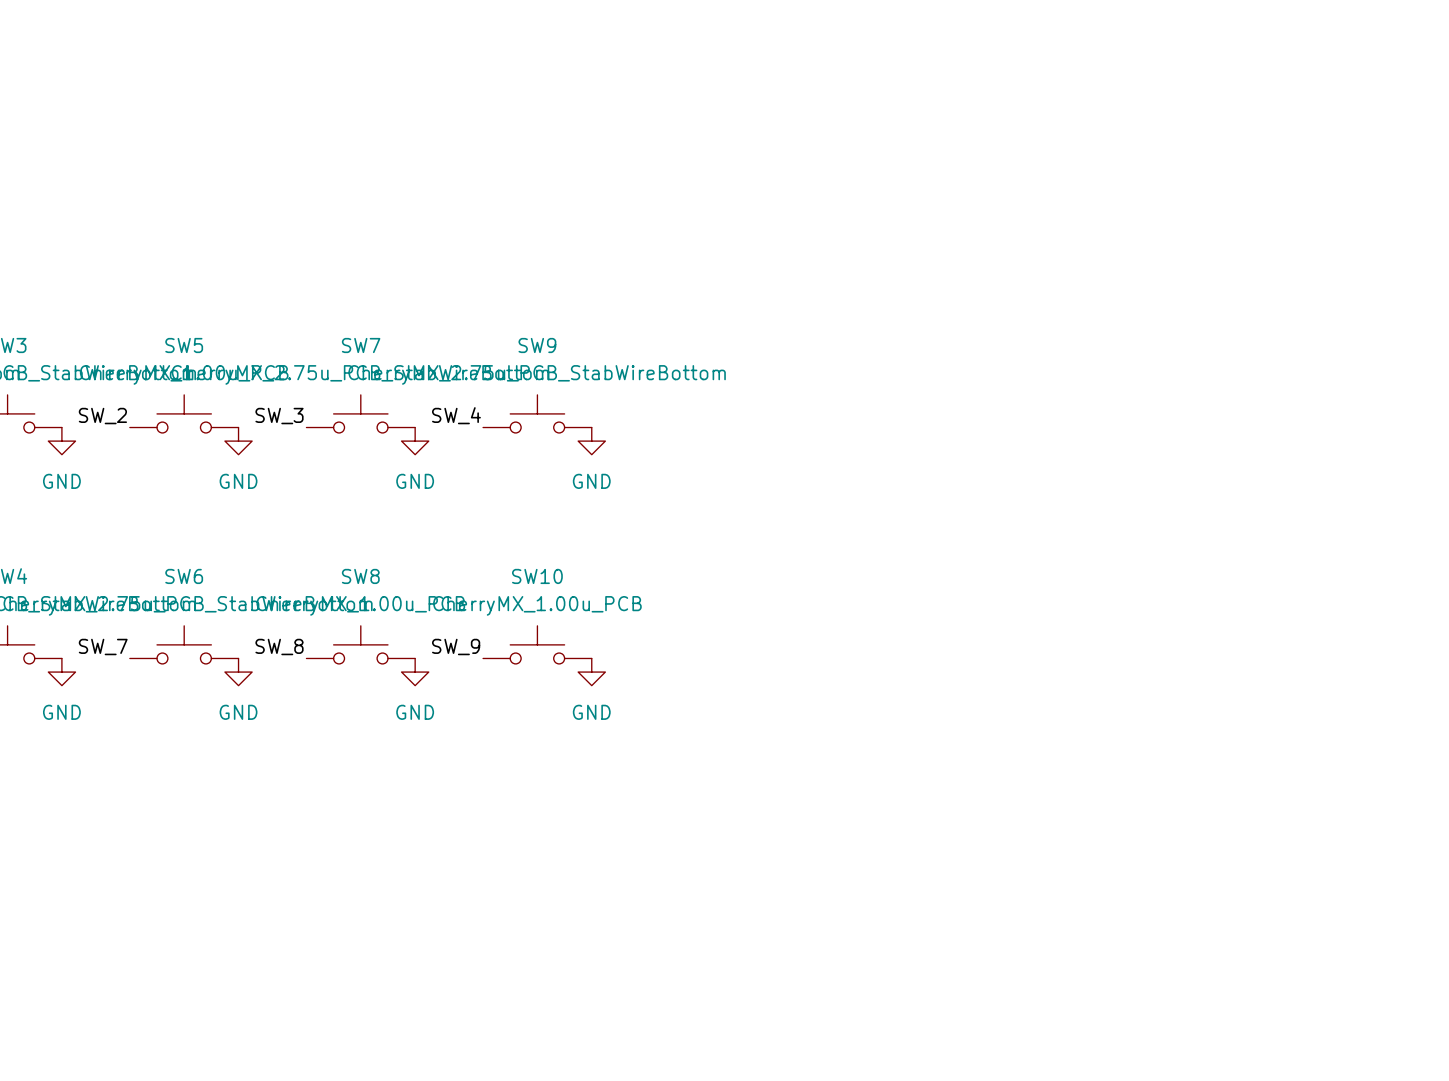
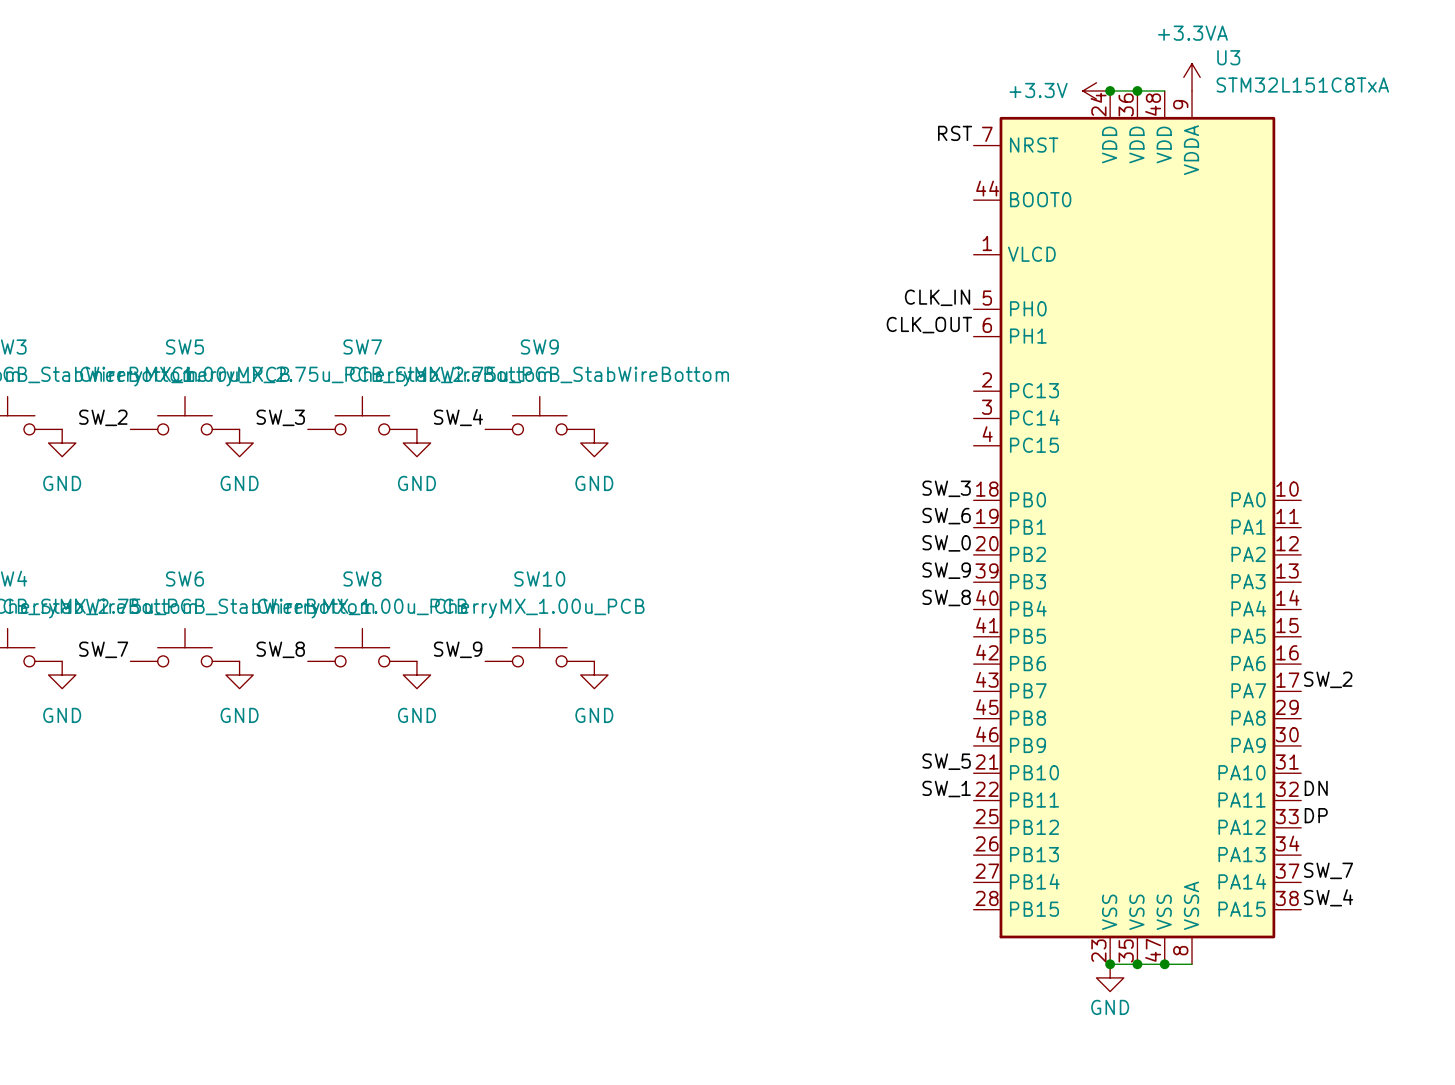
power symbol: none -> +3.3VA (1192, 77)
power symbol: none -> +3.3V (1096, 90)
wire: none -> (1110, 90) (1164, 90)
junction: none -> (1110, 90)
junction: none -> (1137, 90)
label: none -> RST (955, 133)
label: none -> CLK_IN (937, 297)
label: none -> CLK_OUT (929, 325)
label: none -> SW_3 (946, 488)
label: none -> SW_6 (946, 516)
U3: none -> STM32L151C8TxA (1137, 527)
label: none -> SW_0 (946, 543)
label: none -> SW_9 (946, 570)
label: none -> SW_8 (946, 597)
label: none -> SW_2 (1328, 679)
label: none -> SW_5 (946, 761)
label: none -> DN (1316, 788)
label: none -> SW_1 (946, 789)
label: none -> DP (1316, 815)
label: none -> SW_7 (1328, 870)
label: none -> SW_4 (1328, 897)
wire: none -> (1110, 964) (1192, 964)
junction: none -> (1110, 964)
junction: none -> (1137, 964)
junction: none -> (1164, 964)
power symbol: none -> GND (1110, 977)

